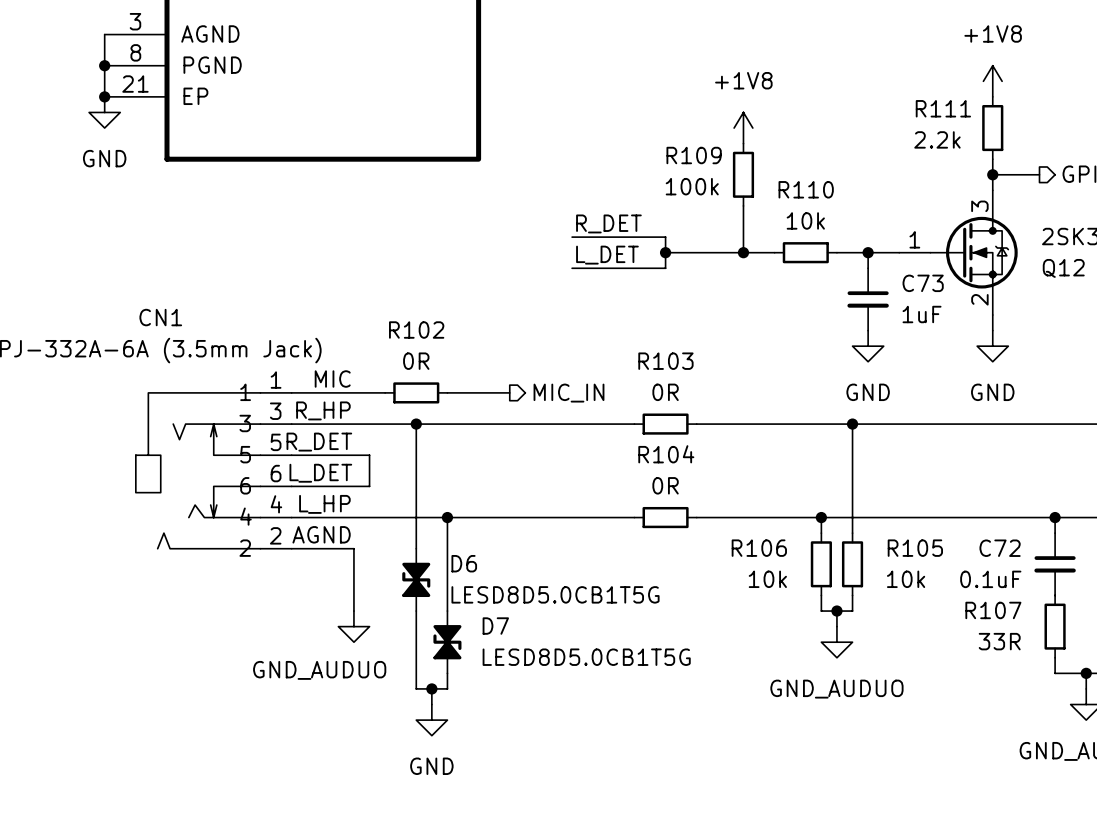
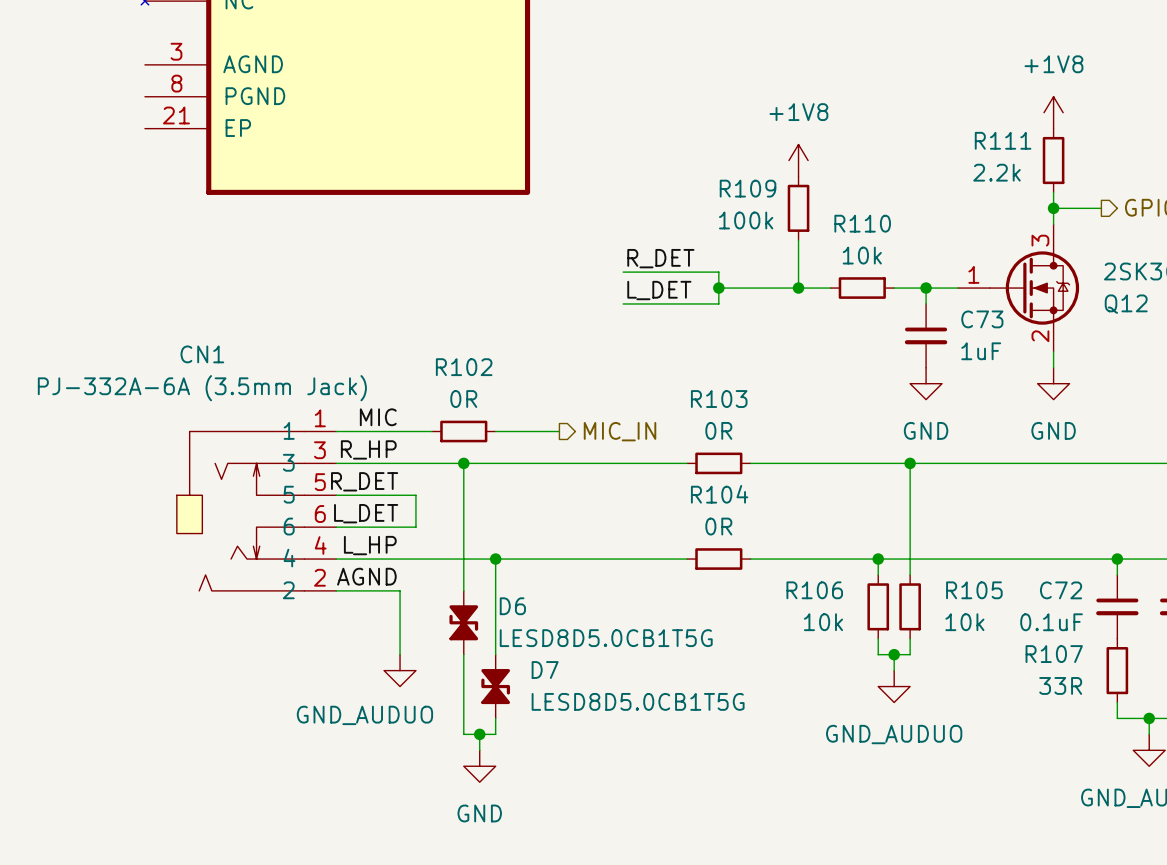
wire: (104, 34) (104, 96) -> none
junction: (104, 65) -> none
junction: (104, 96) -> none
power symbol: GND (104, 112) -> none

